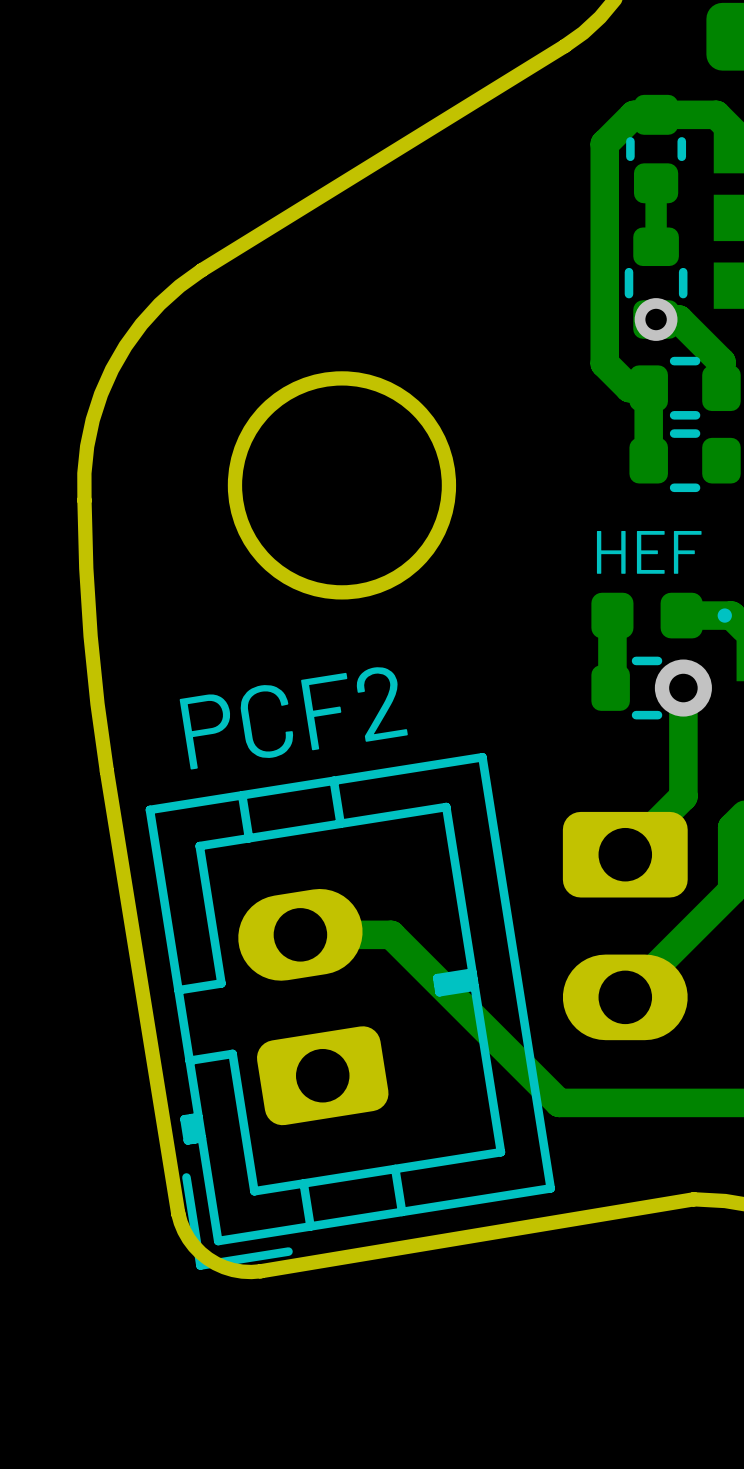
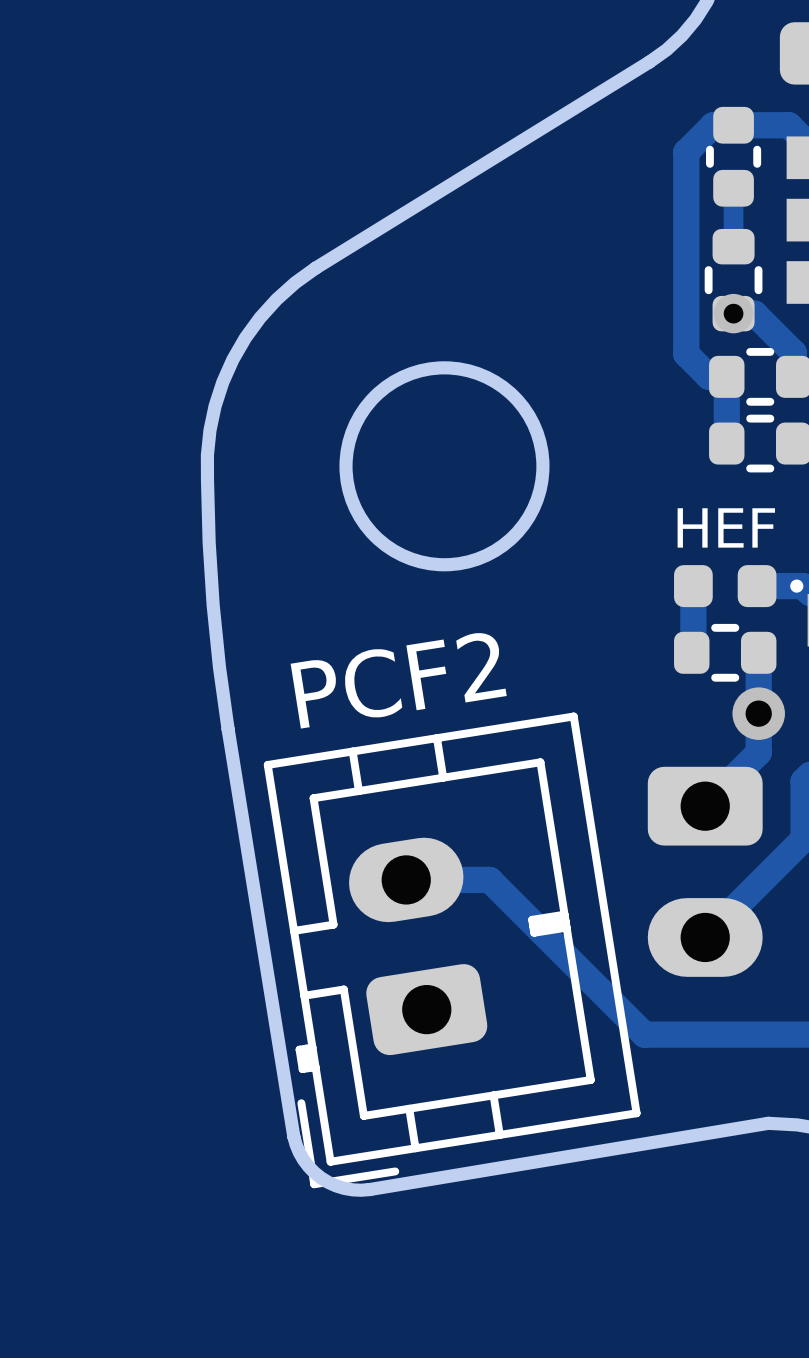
via position: (683, 688) -> (758, 713)

